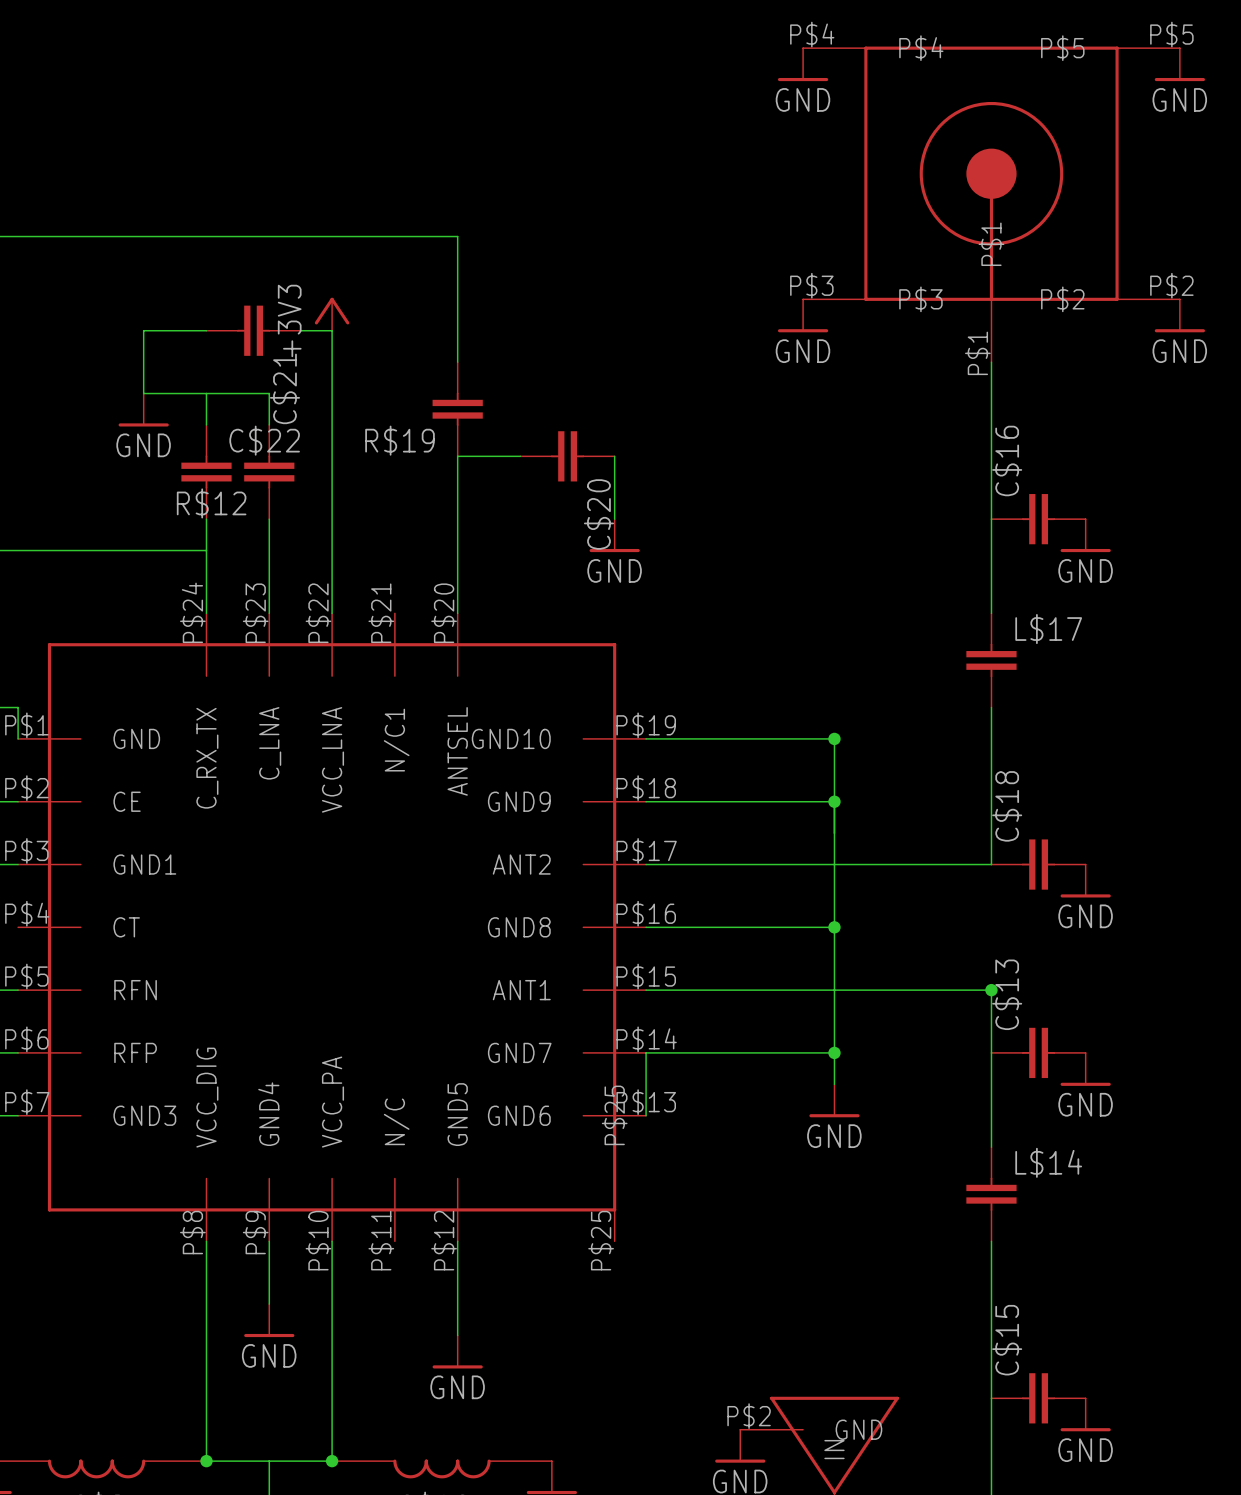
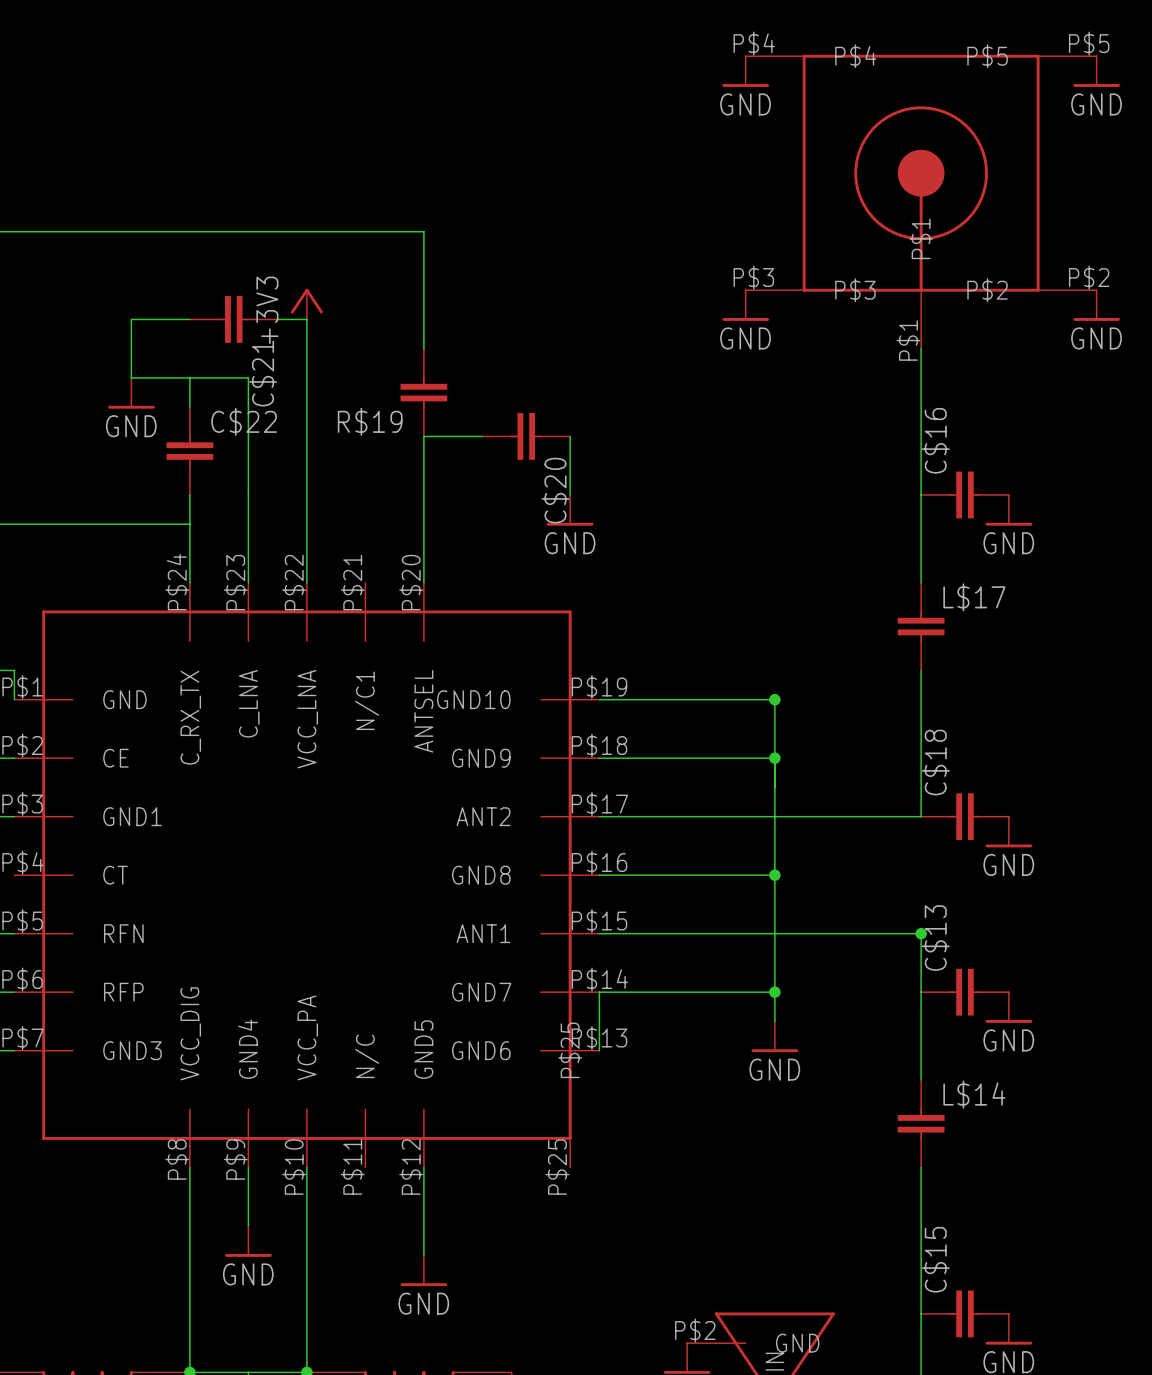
R$12: (269, 472) -> none

